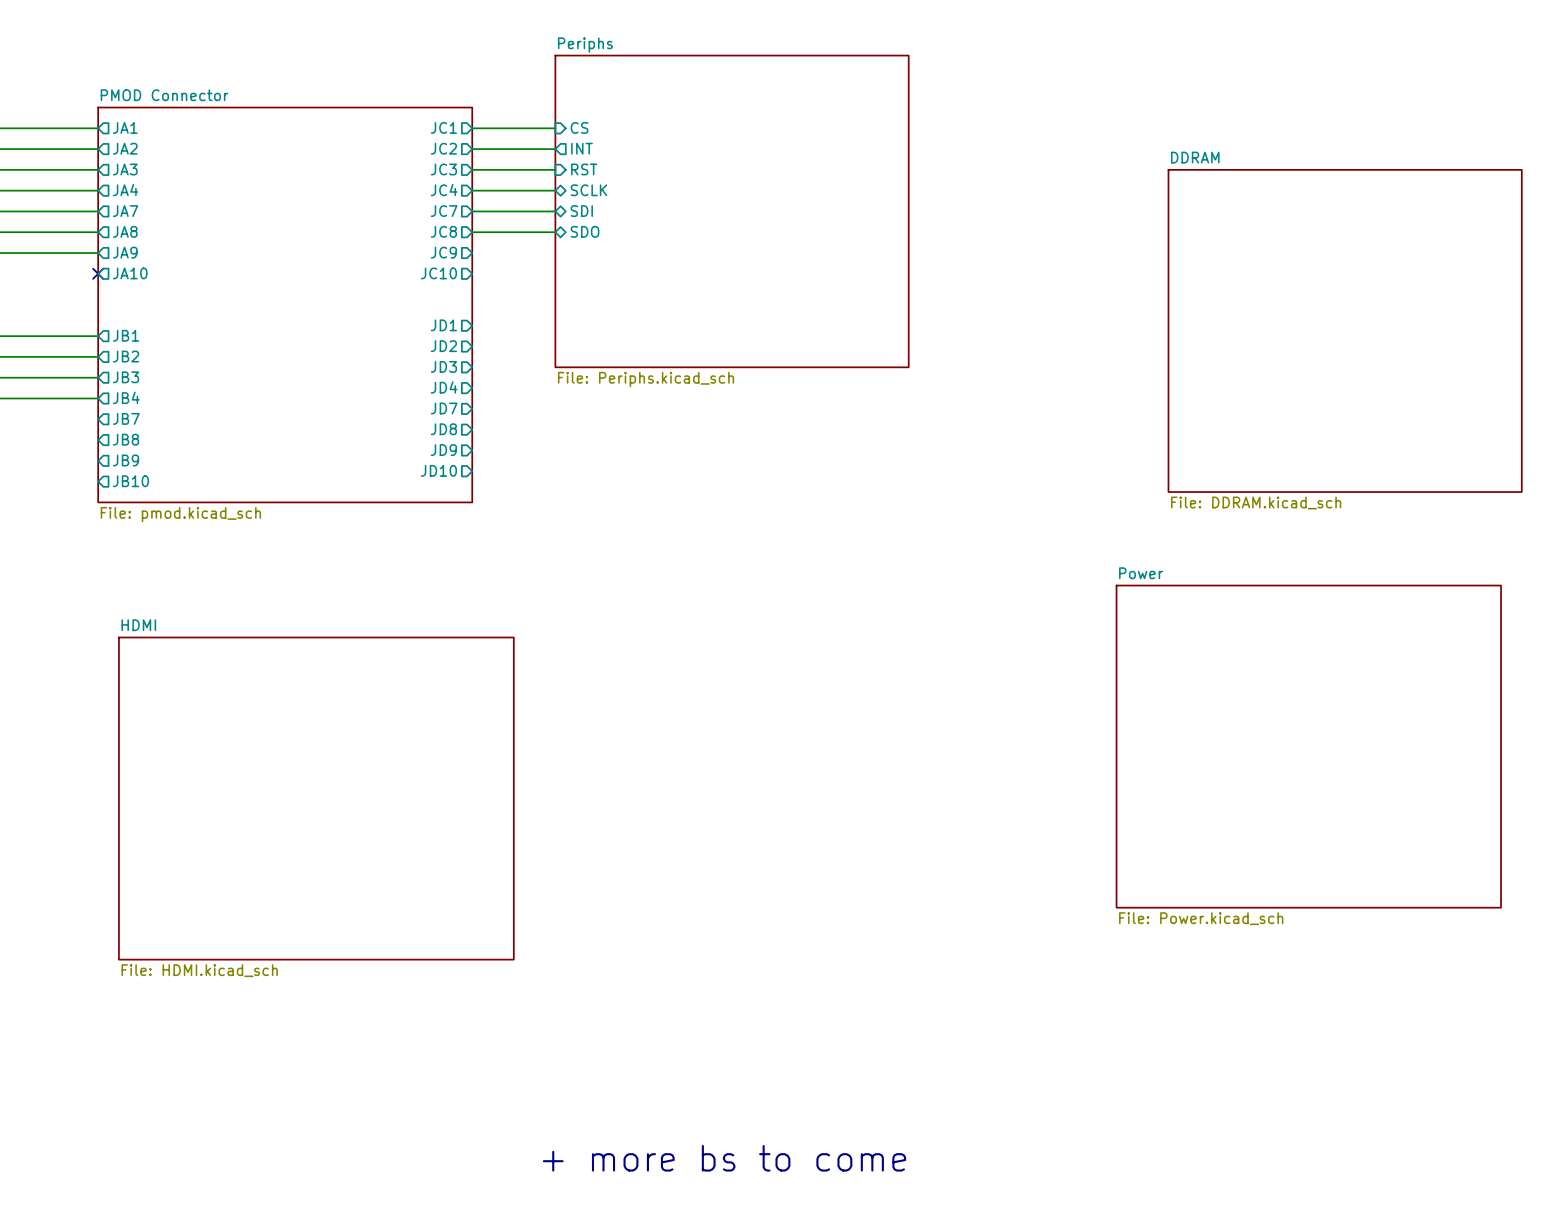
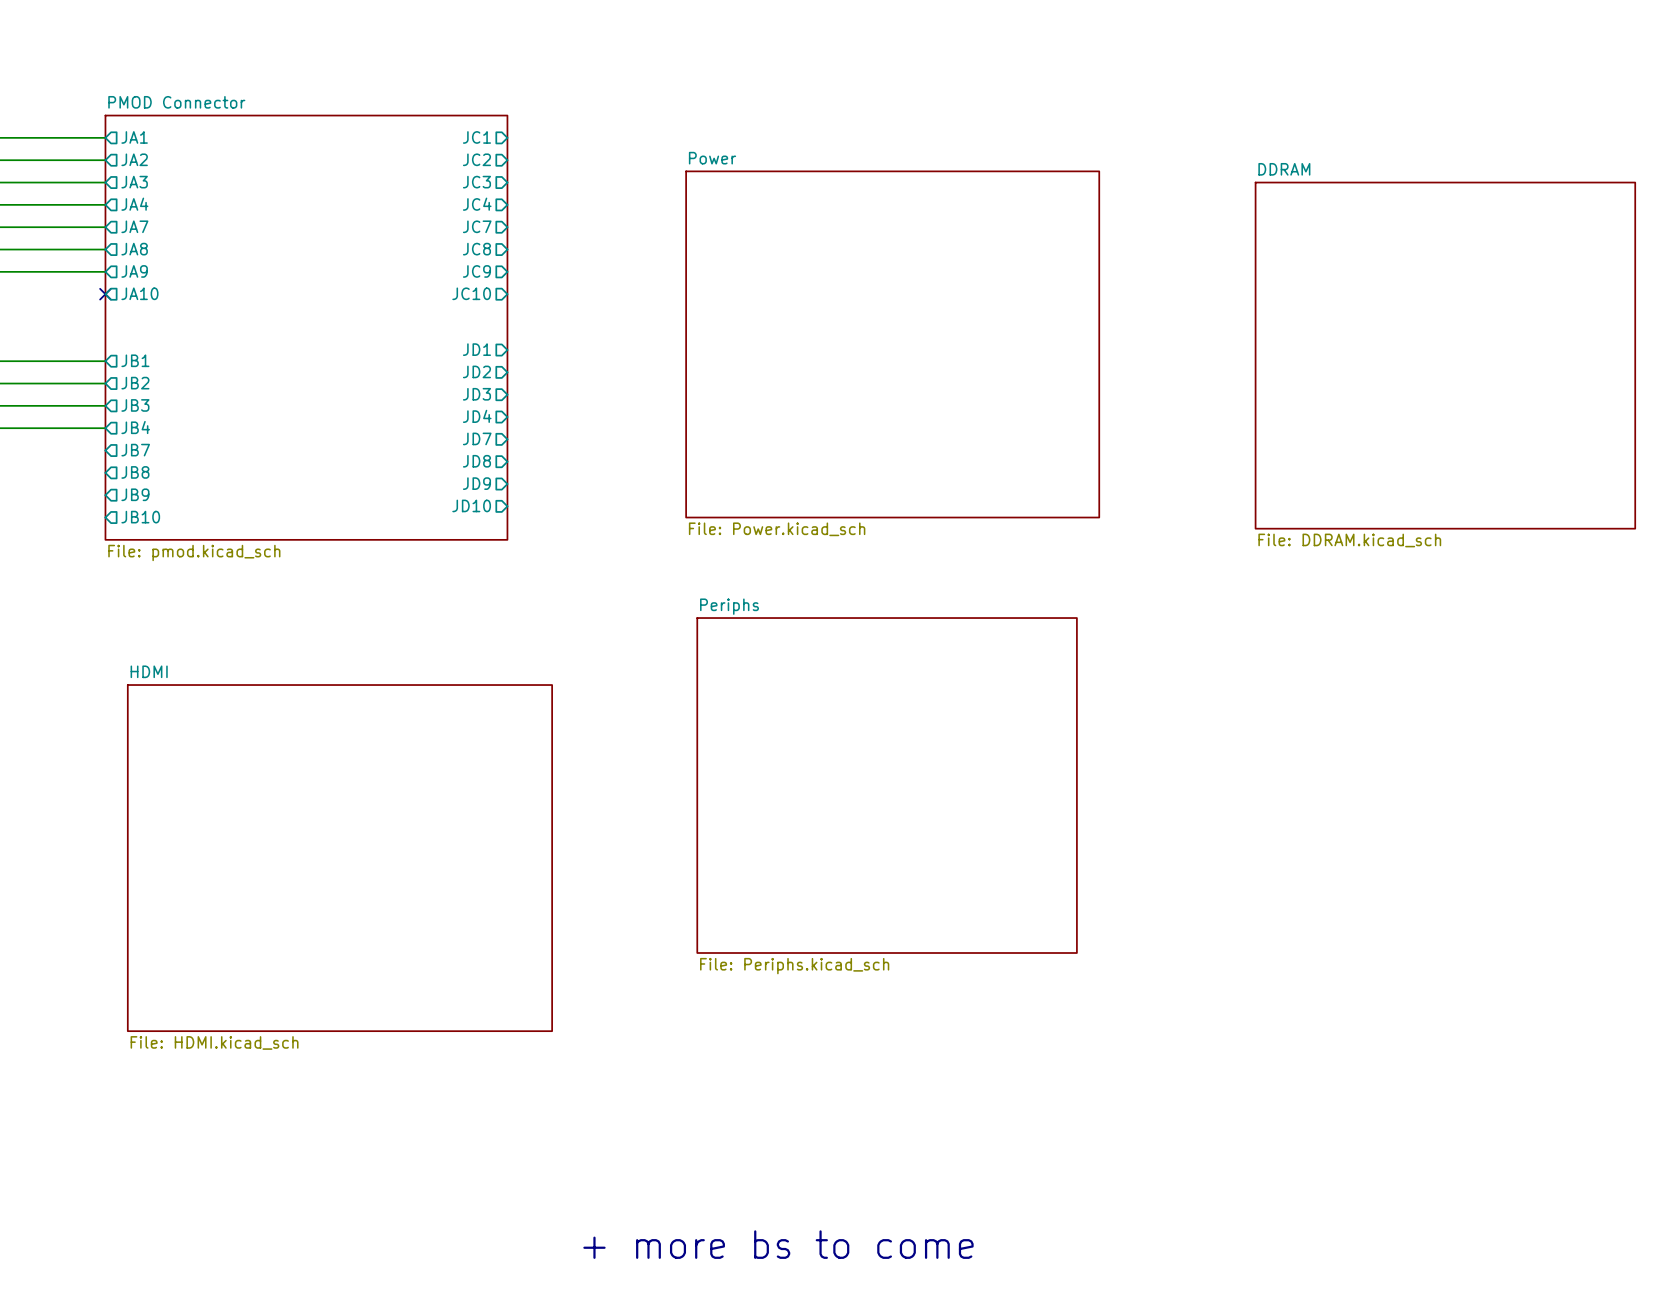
sheet pin: CS (579, 127) -> none
wire: (472, 128) (555, 128) -> none
sheet pin: INT (582, 148) -> none
wire: (472, 149) (555, 149) -> none
wire: (472, 169) (555, 169) -> none
sheet pin: RST (584, 169) -> none
wire: (472, 190) (555, 190) -> none
sheet pin: SCLK (588, 190) -> none
wire: (472, 211) (555, 211) -> none
sheet pin: SDI (581, 211) -> none
sheet Periphs: File: Periphs.kicad_sch (732, 211) -> none
sheet pin: SDO (584, 231) -> none
wire: (472, 232) (555, 232) -> none
sheet Power: none -> File: Power.kicad_sch (892, 344)
sheet Periphs: none -> File: Periphs.kicad_sch (887, 785)
sheet Power: File: Power.kicad_sch (1308, 746) -> none

